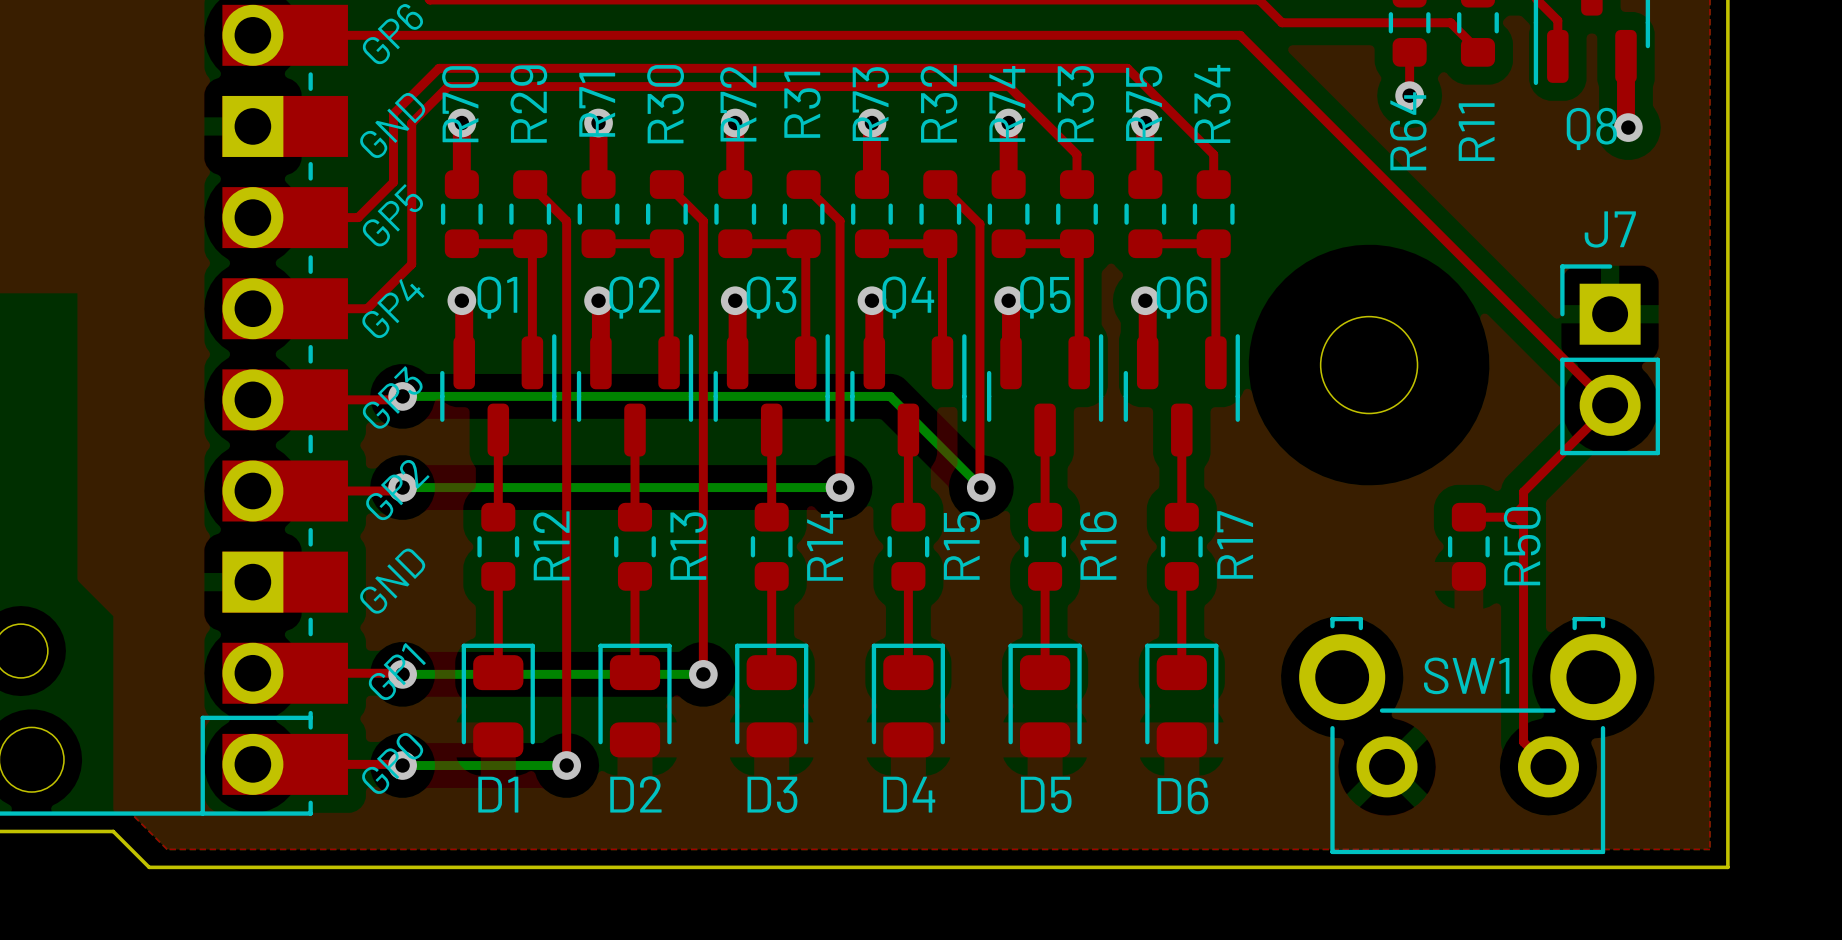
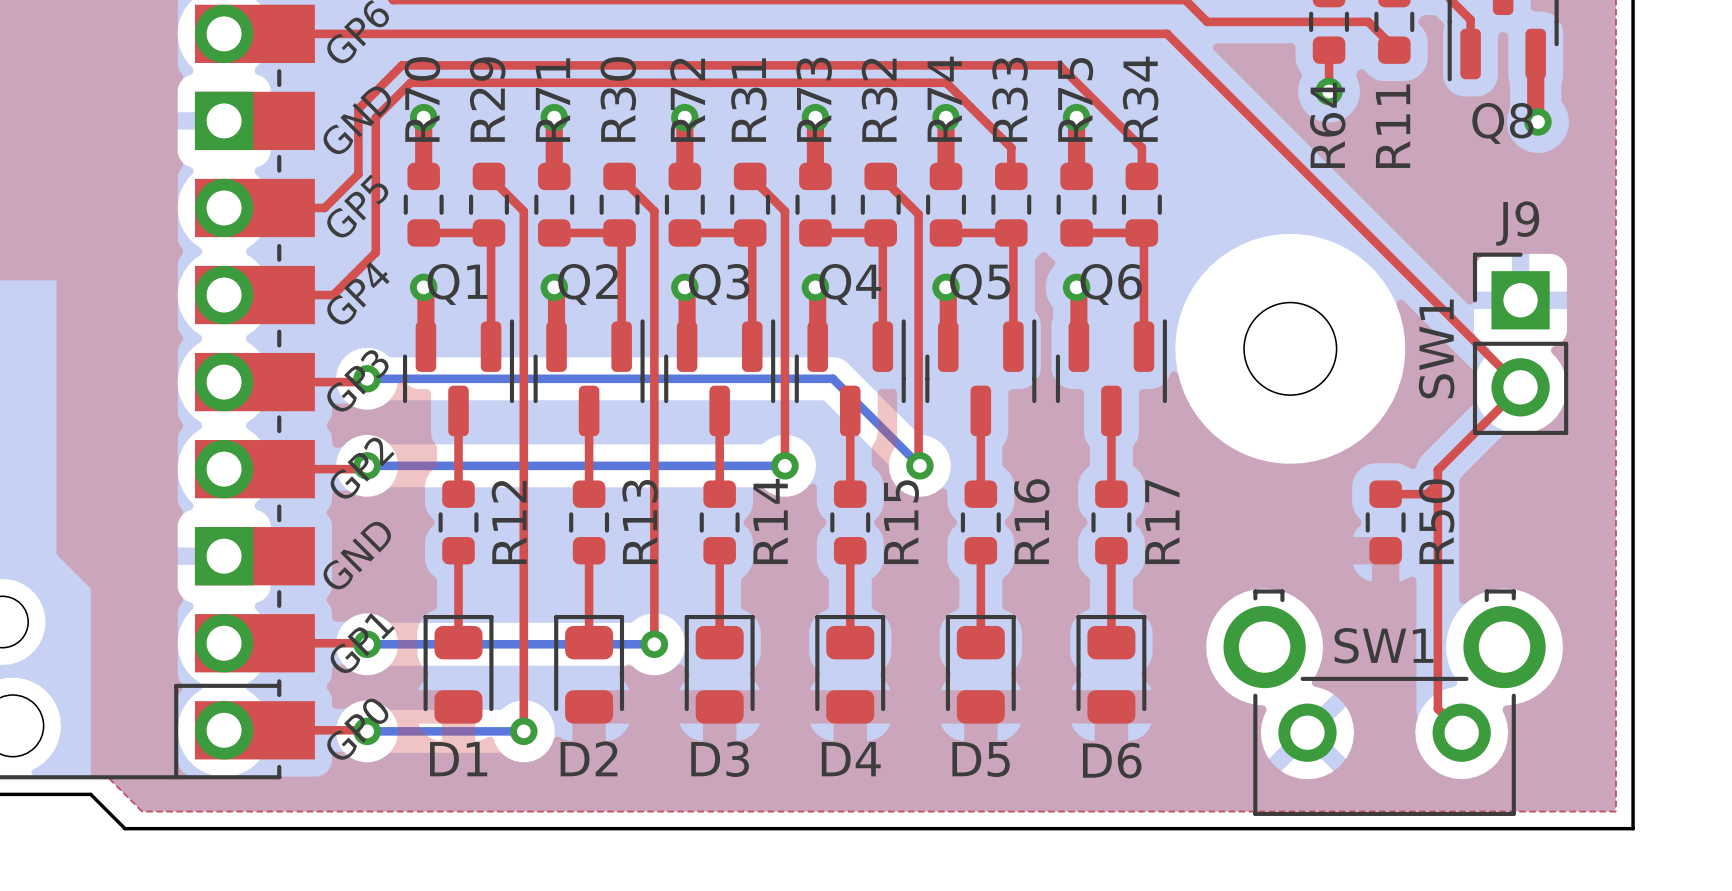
J7 name: J7 (1610, 229) -> J9 (1517, 223)
J7 value: none -> SW1 (1436, 348)

